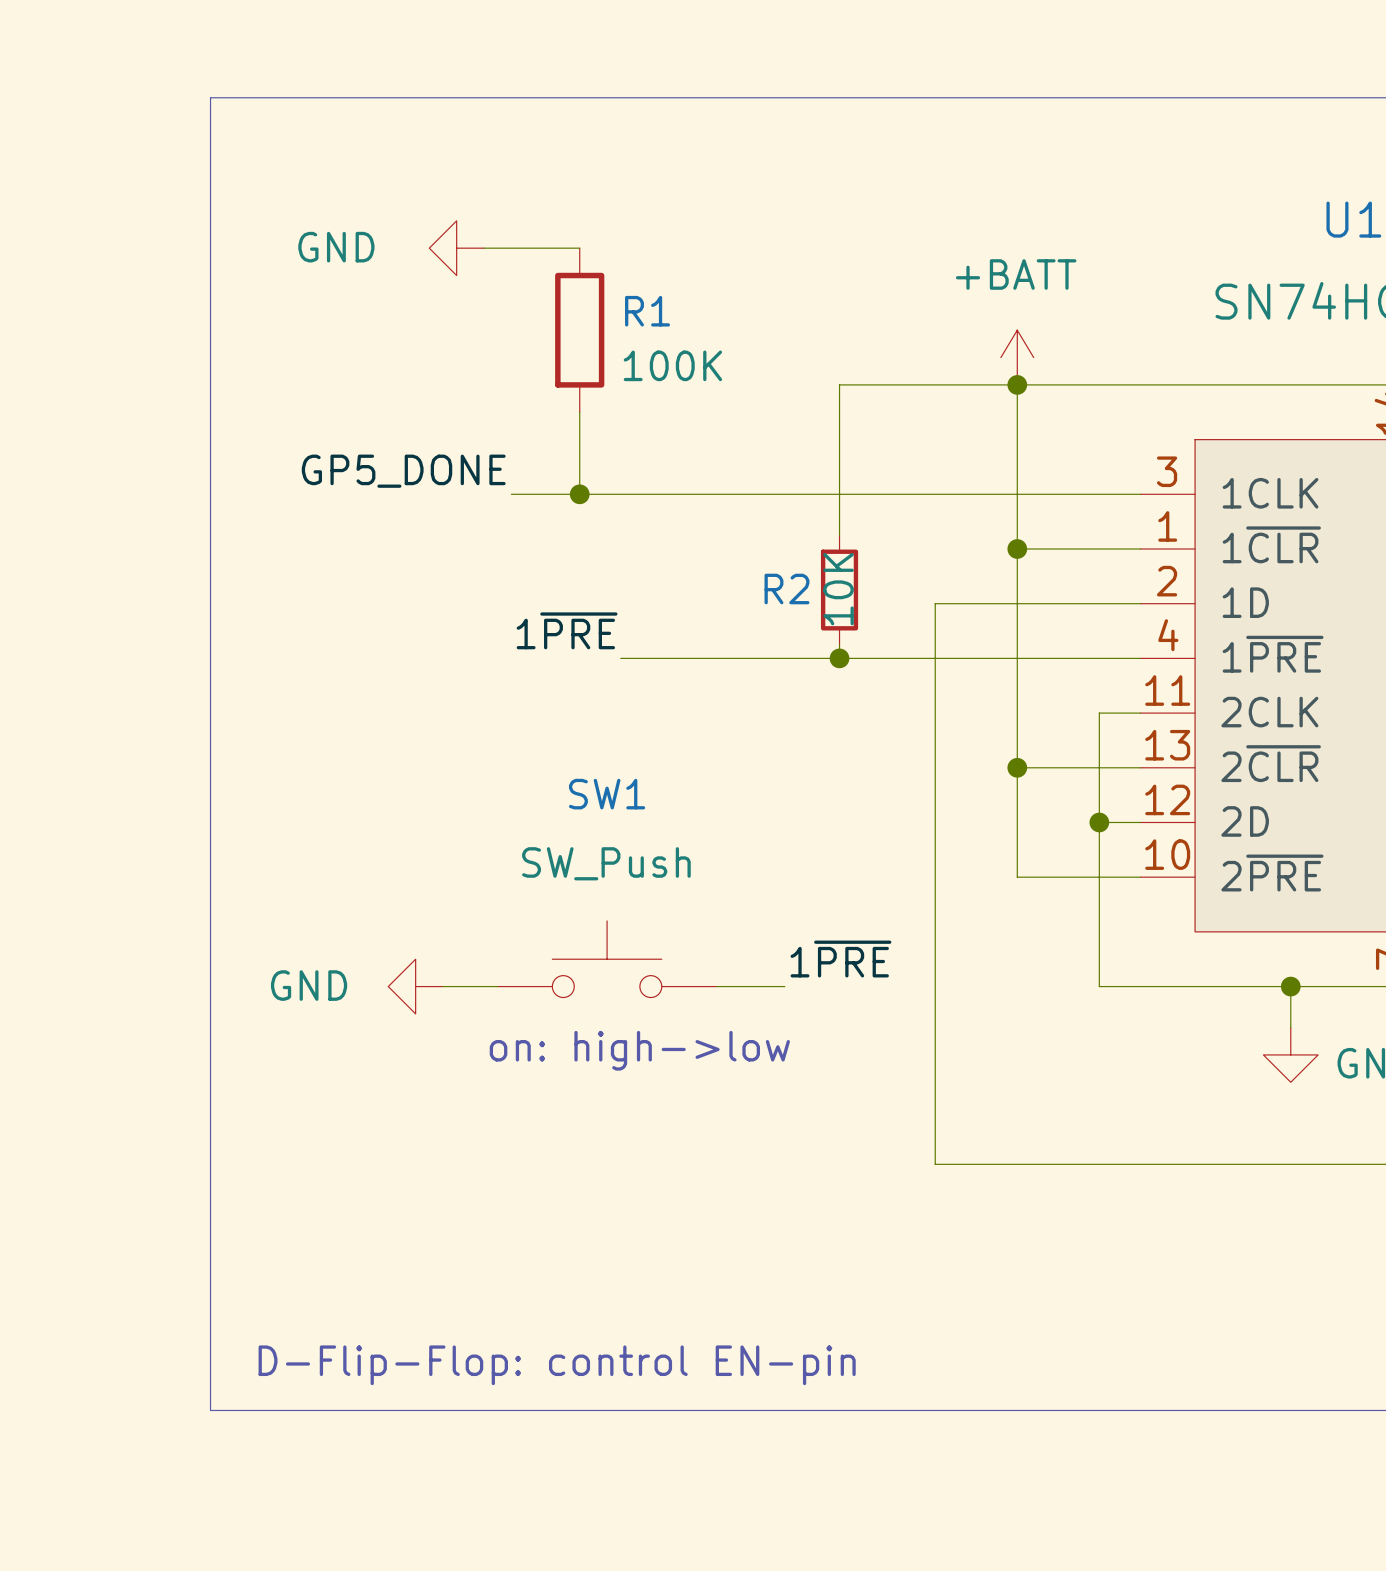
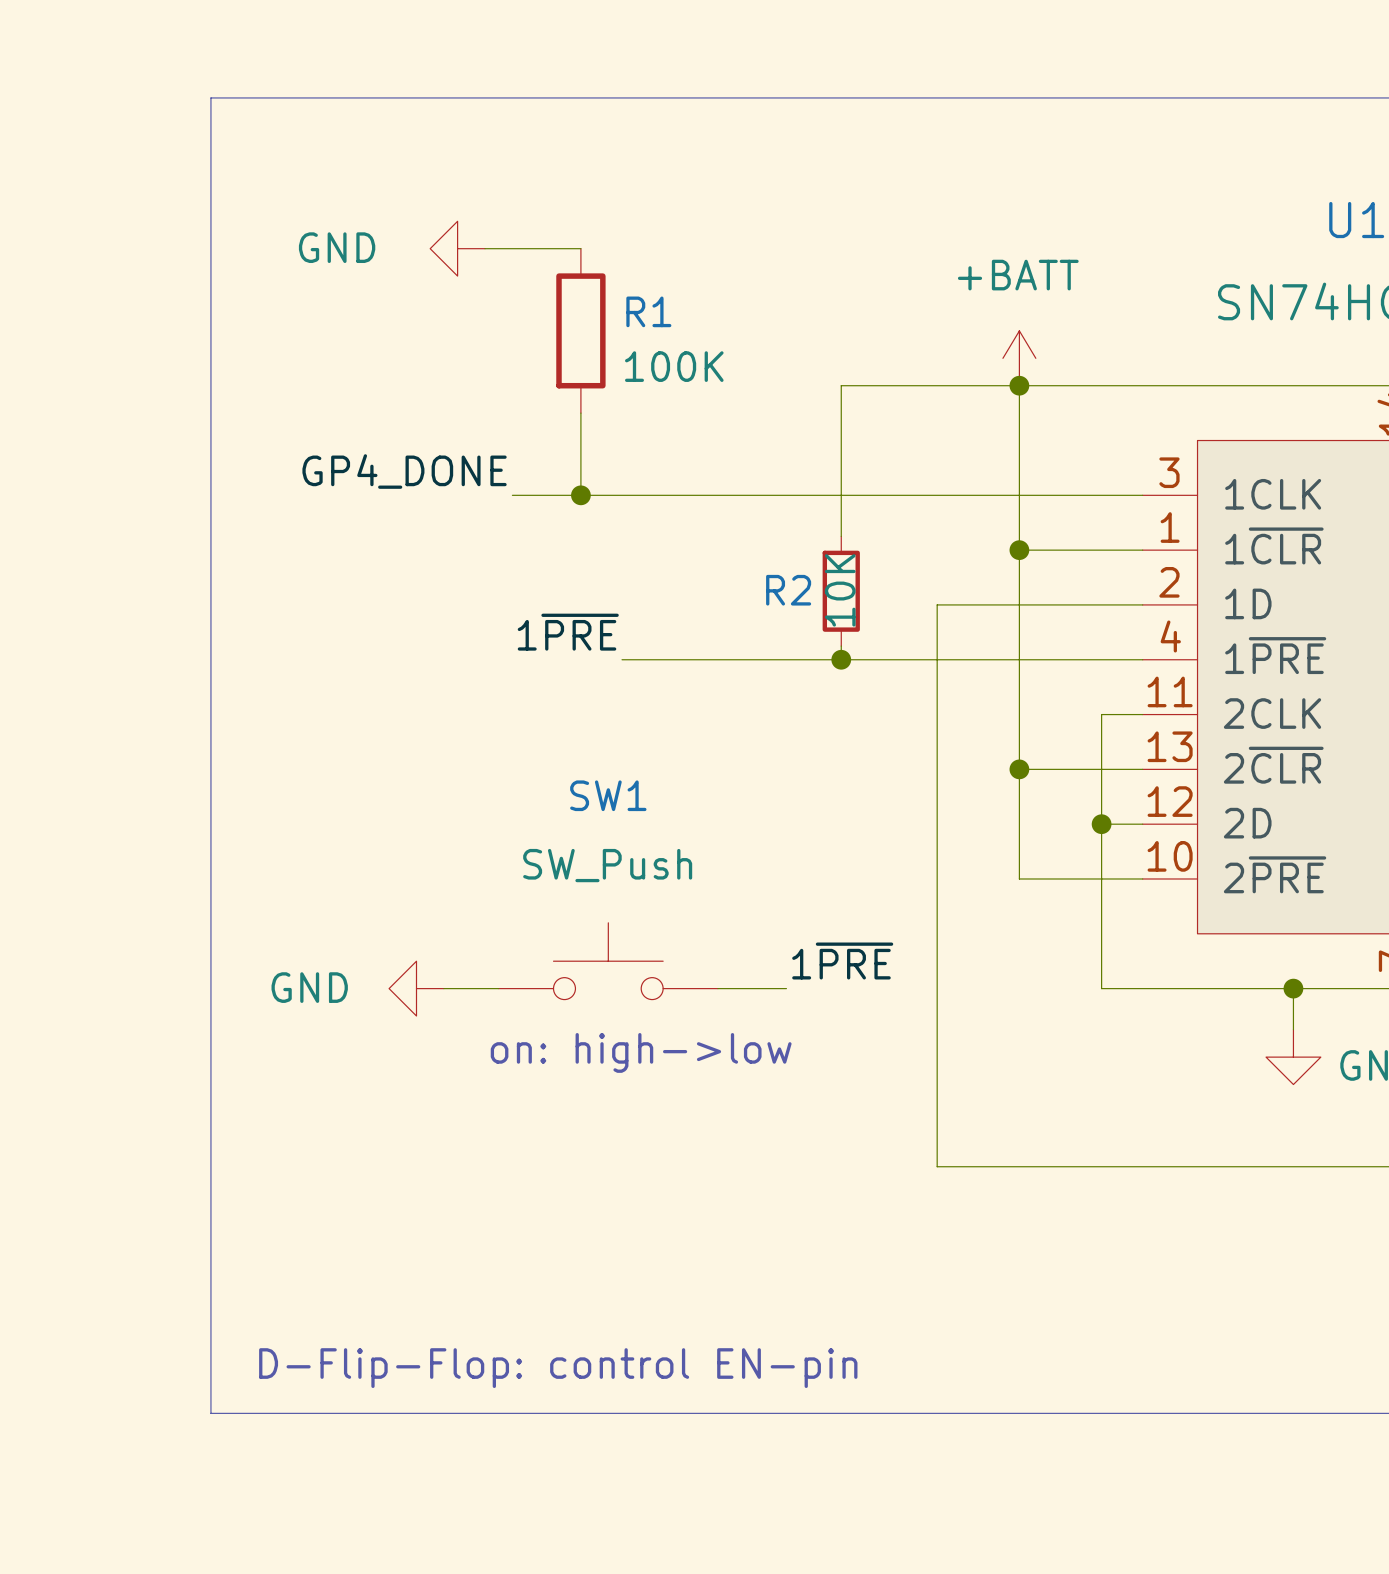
label: GP5_DONE (403, 471) -> GP4_DONE (404, 471)

